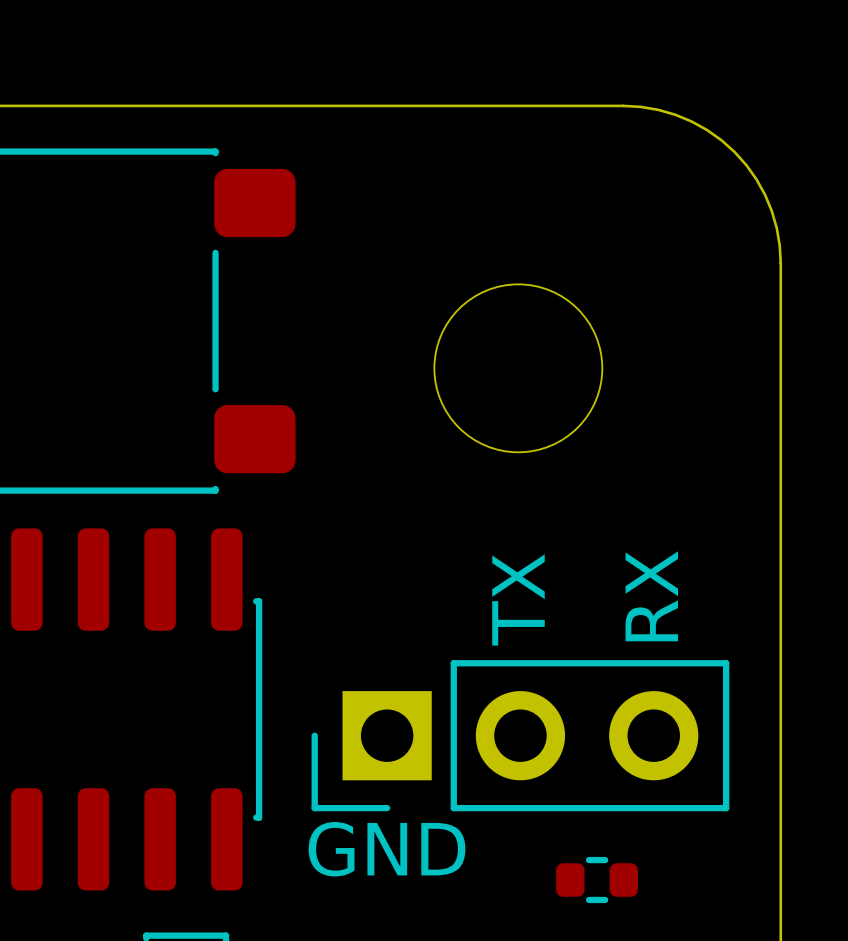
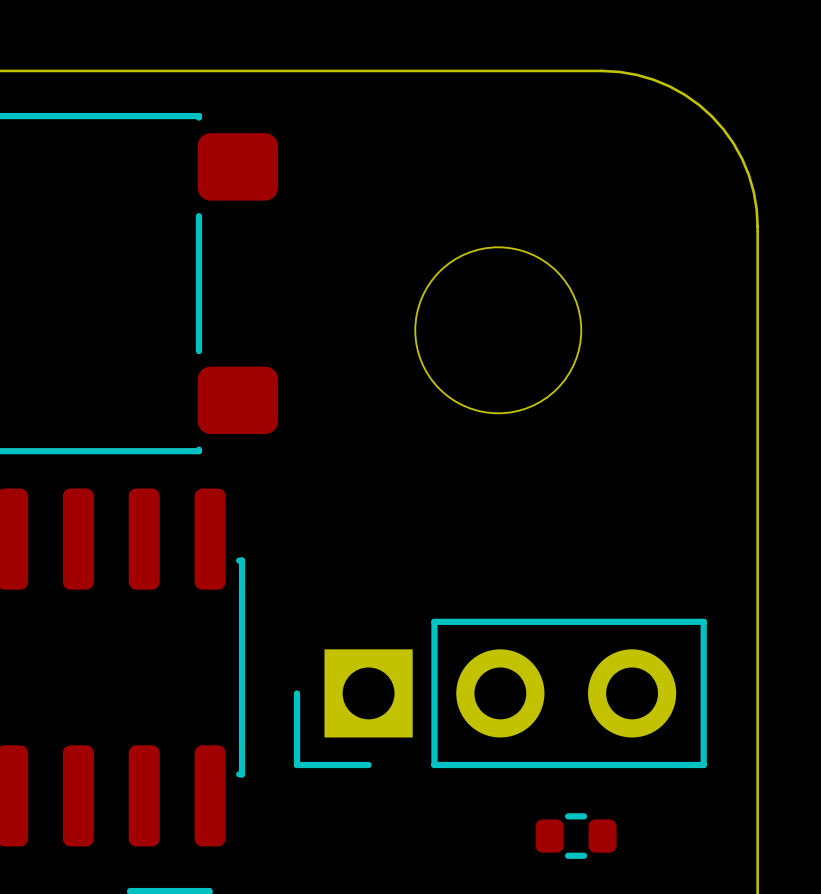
text: RX (651, 596) -> none
text: TX (518, 599) -> none
text: GND (387, 849) -> none

